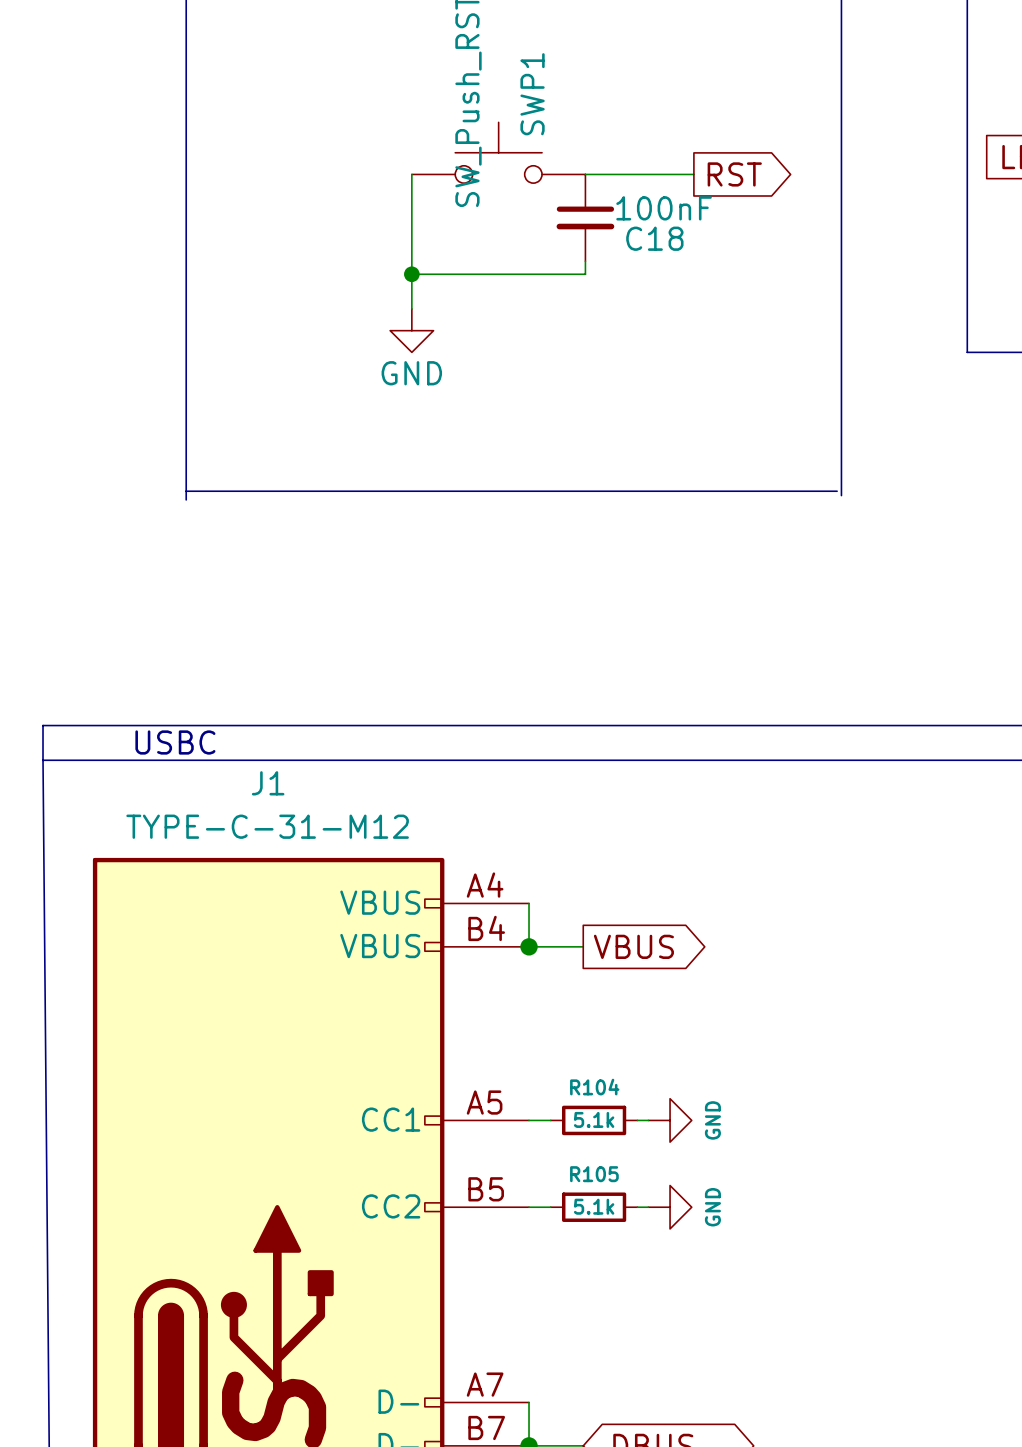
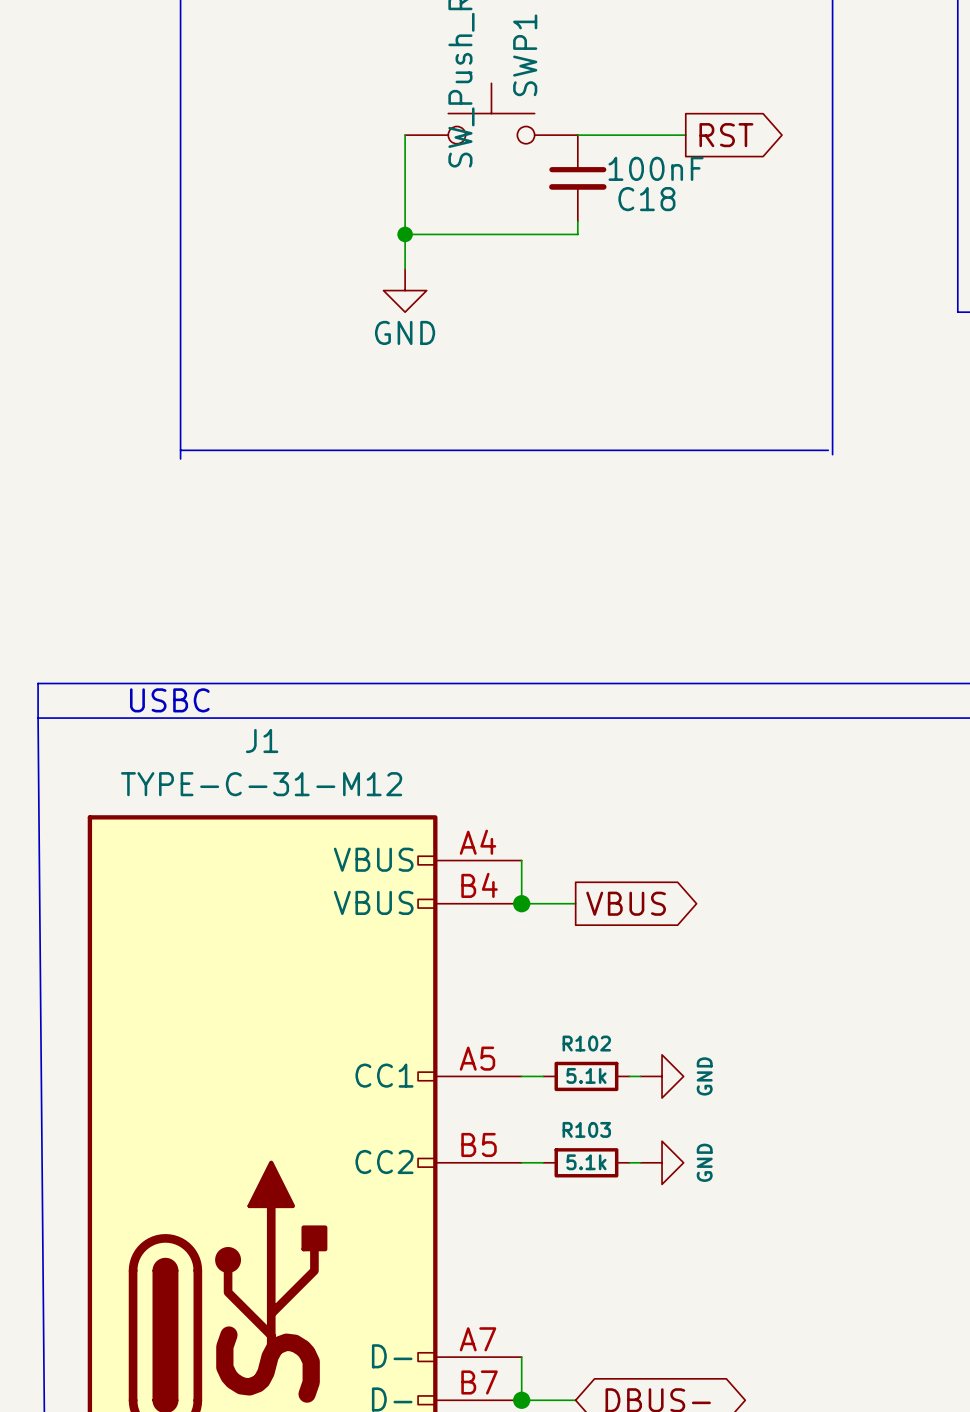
R104 name: R104 (594, 1087) -> R102 (586, 1043)
R105 name: R105 (594, 1174) -> R103 (586, 1129)

